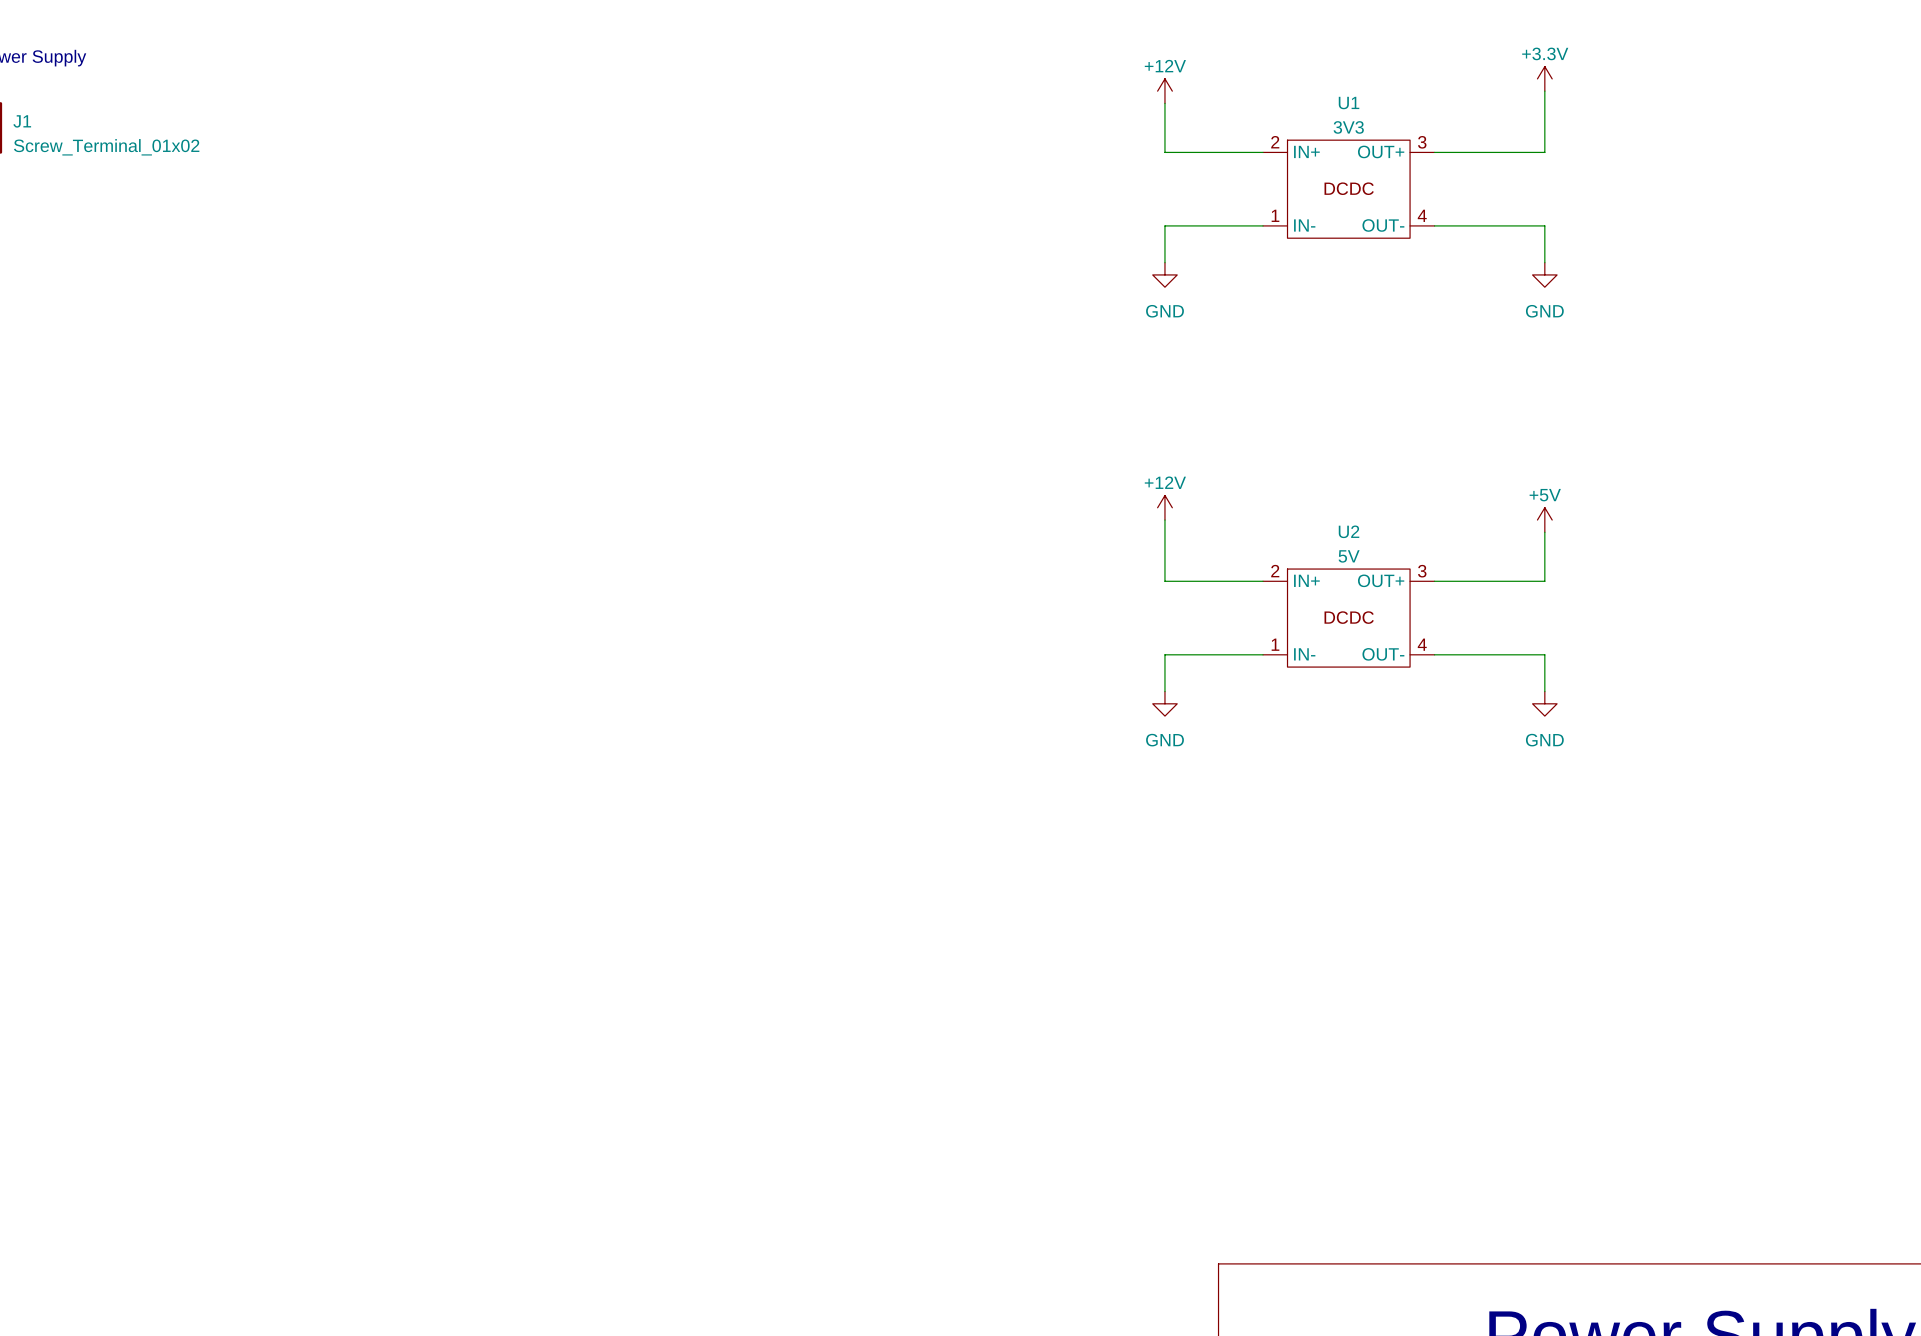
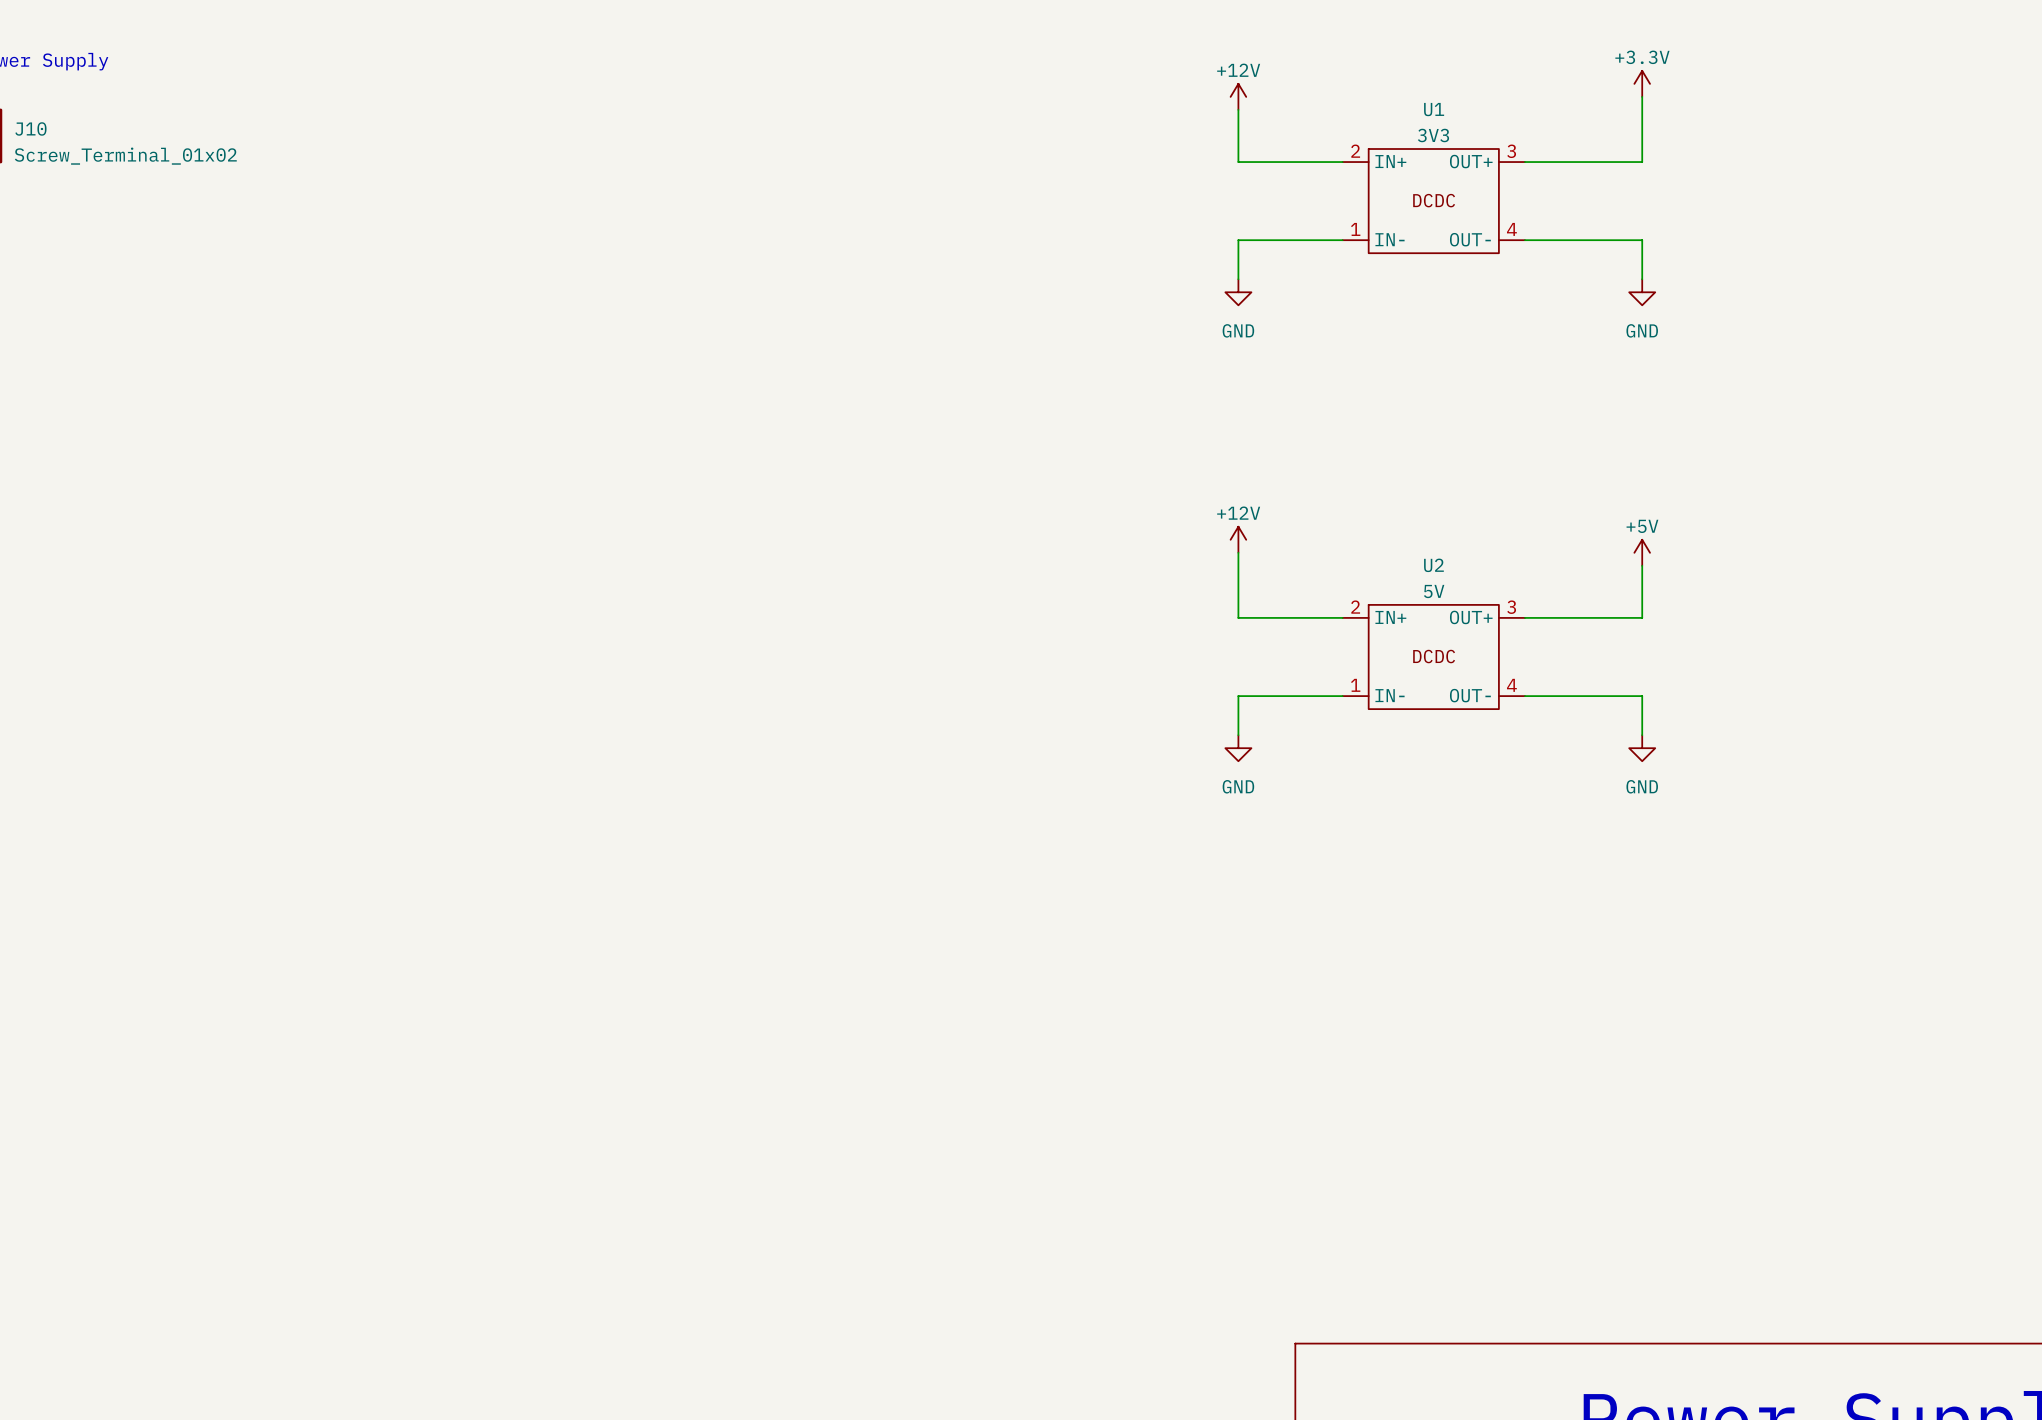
J1 name: J1 (22, 121) -> J10 (30, 128)

